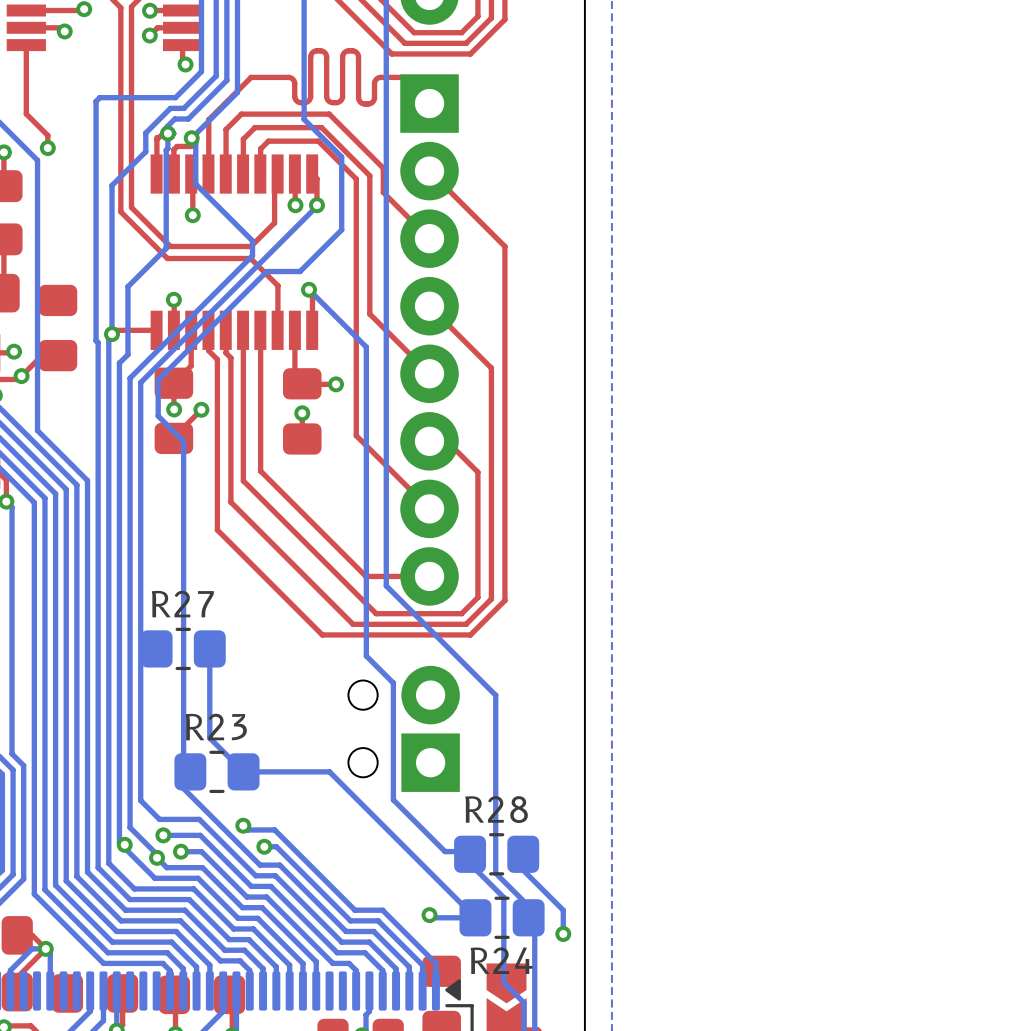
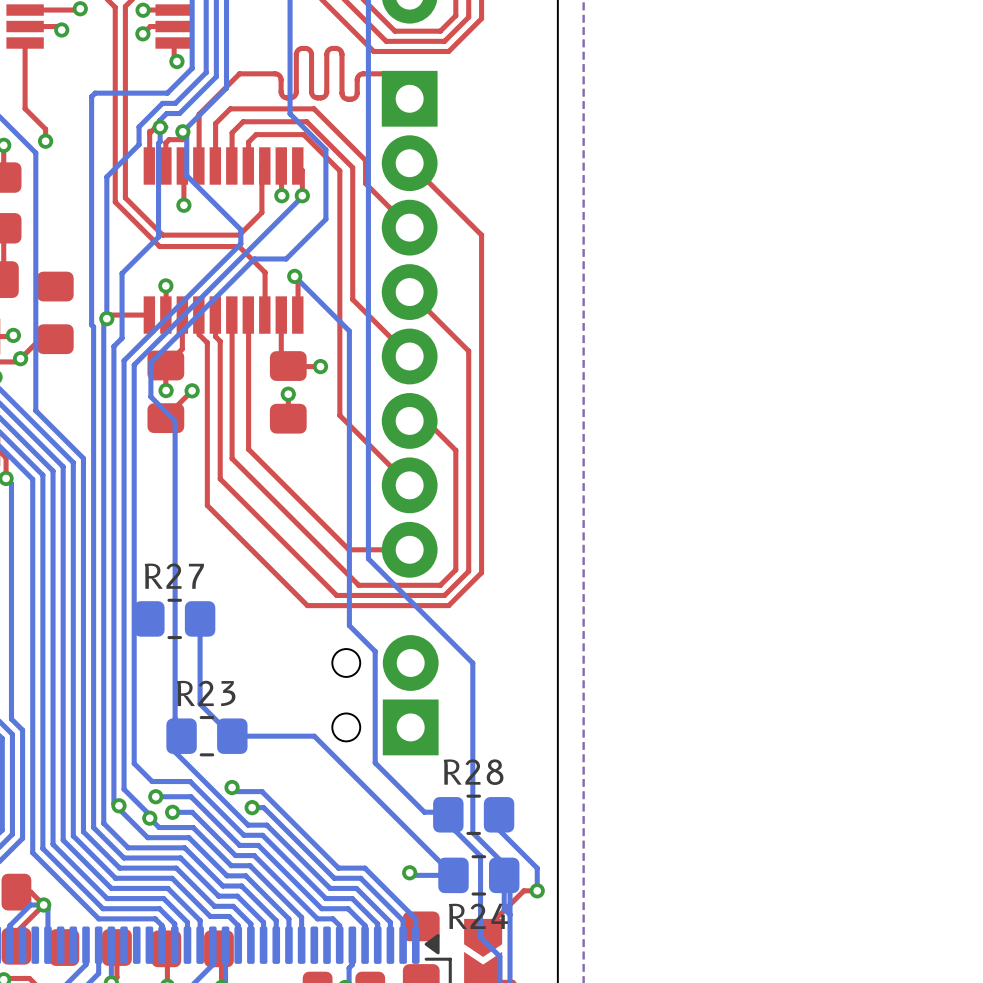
bottom track: none -> (504, 875) (504, 908) (510, 914)
top track: none -> (537, 890) (523, 890) (483, 931)

